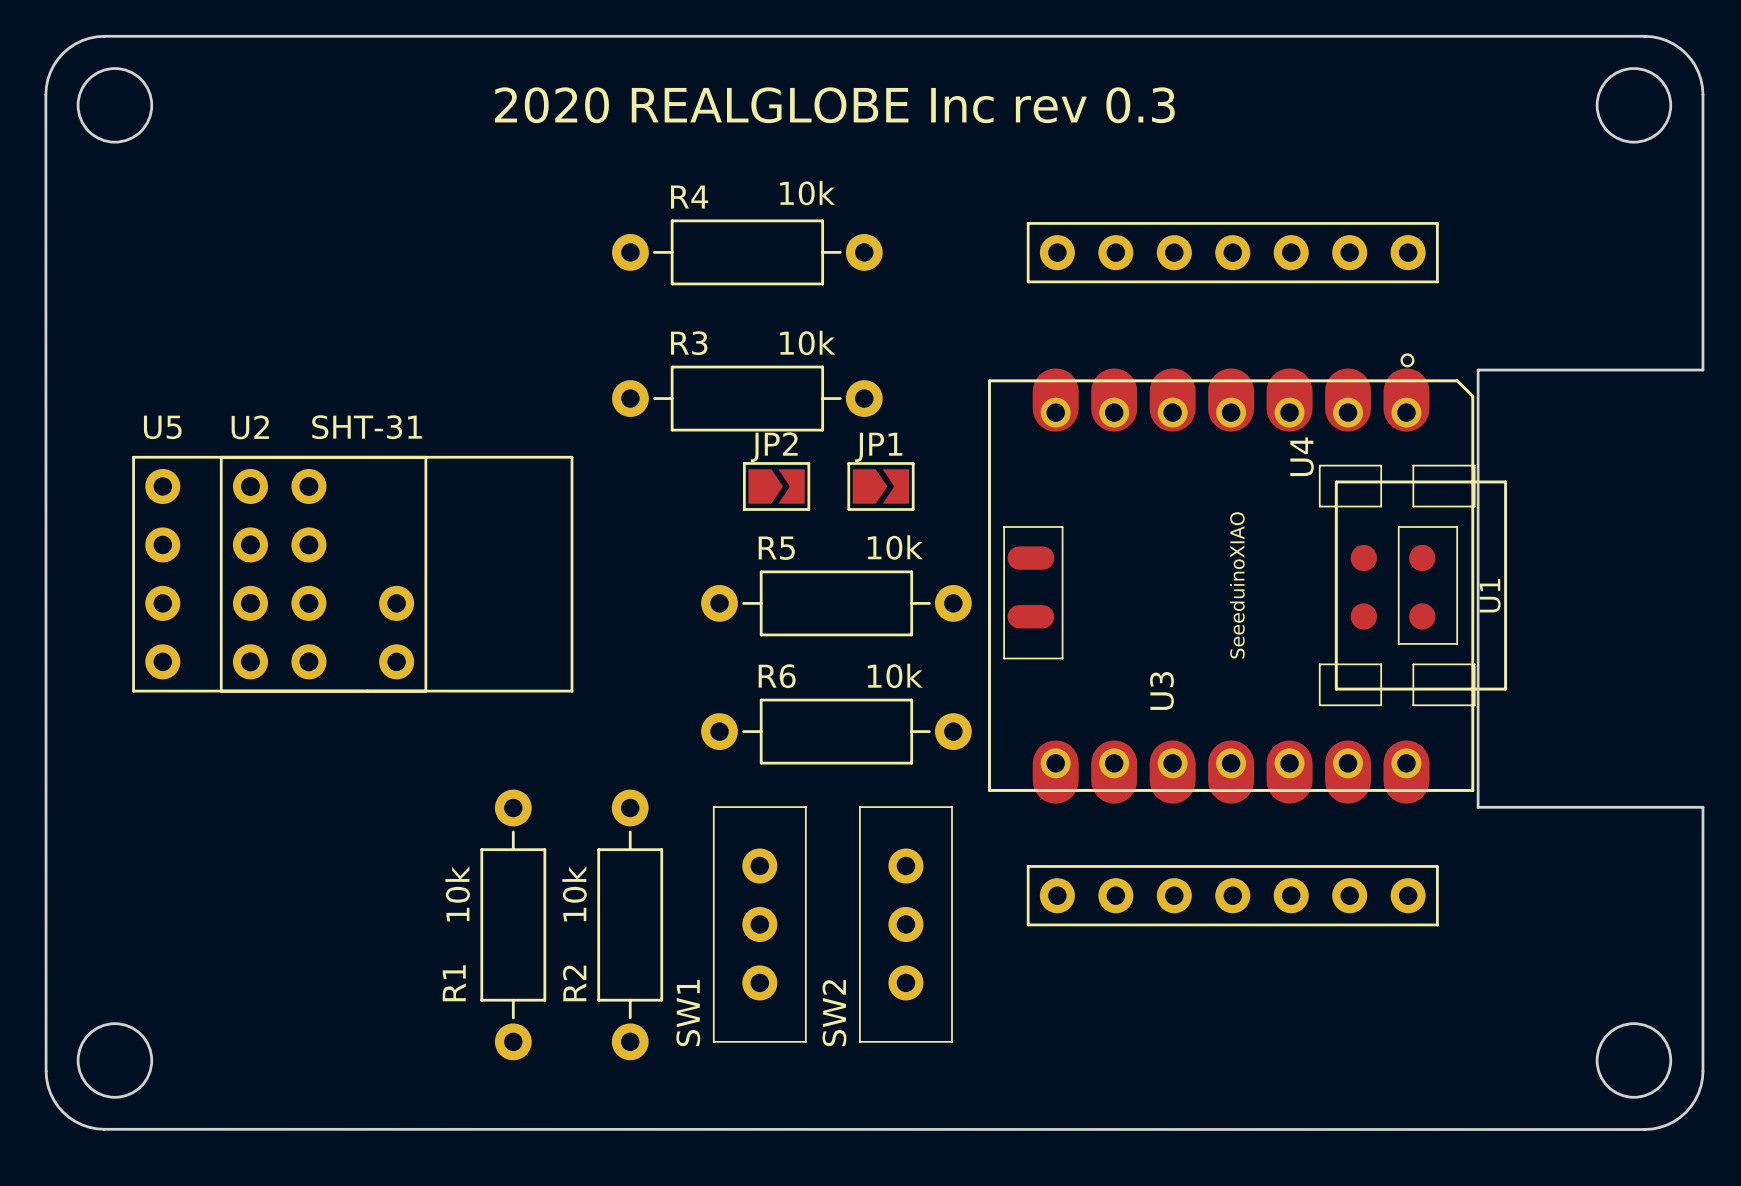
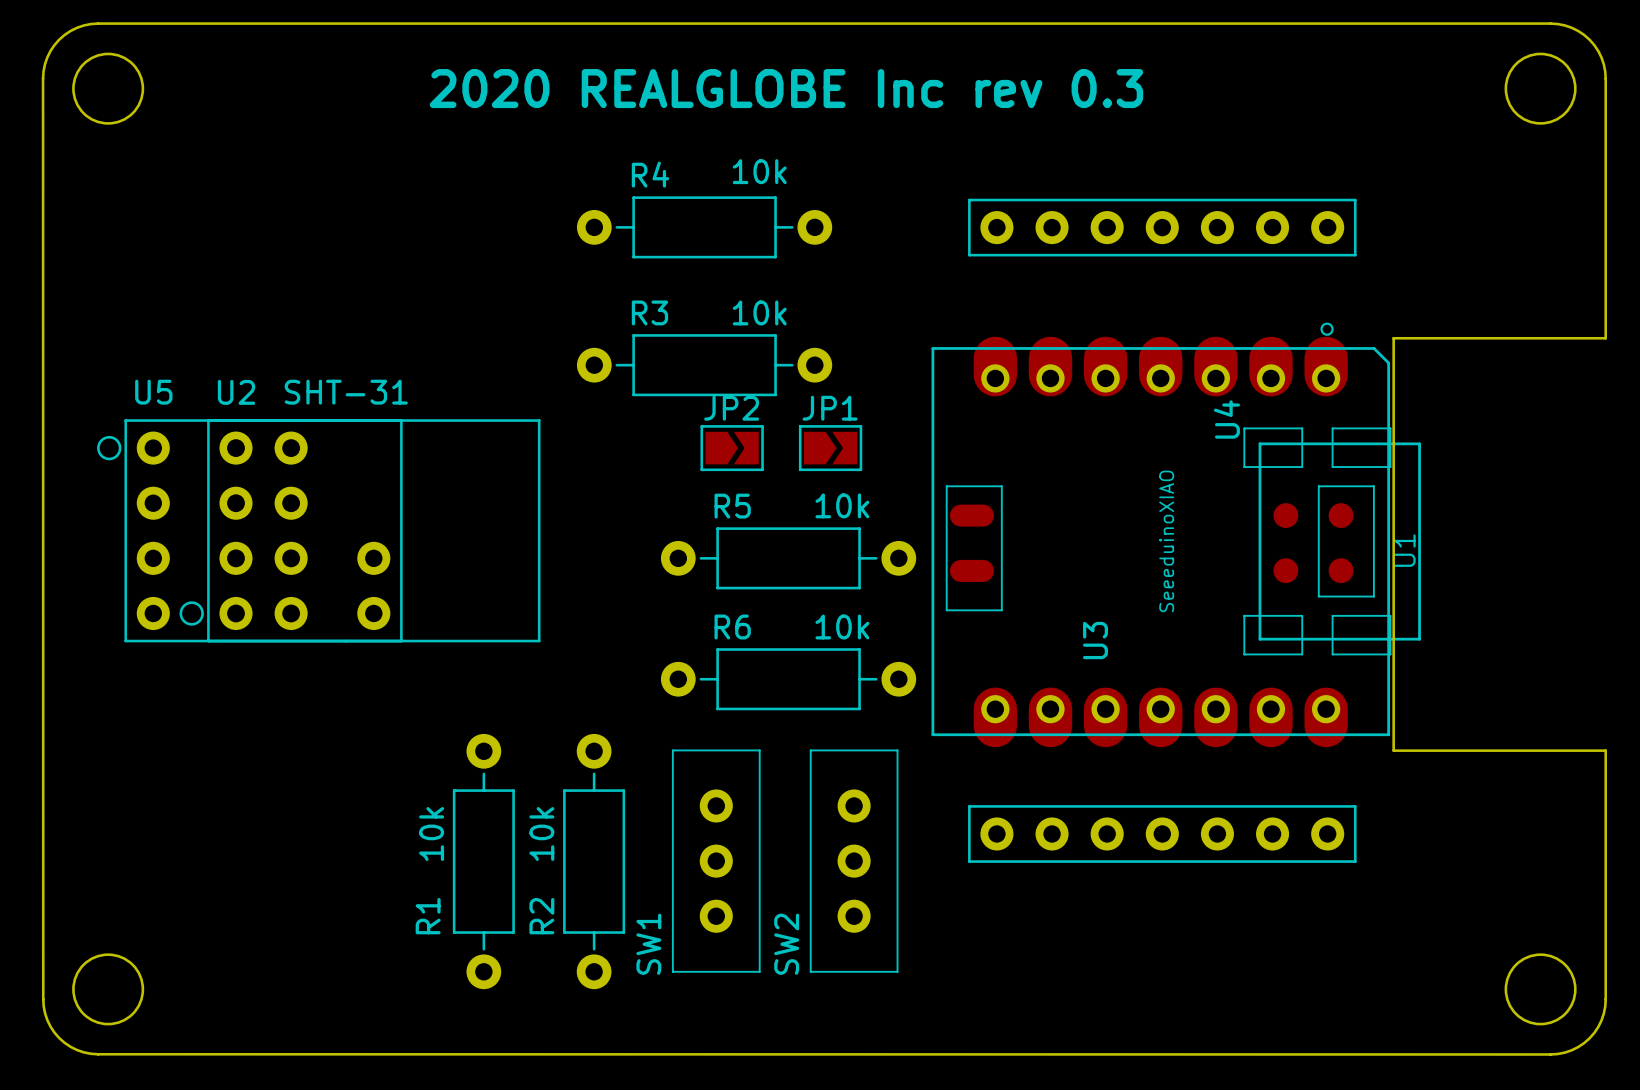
drawing: none -> [97, 435, 122, 461]
drawing: none -> [179, 601, 204, 626]

